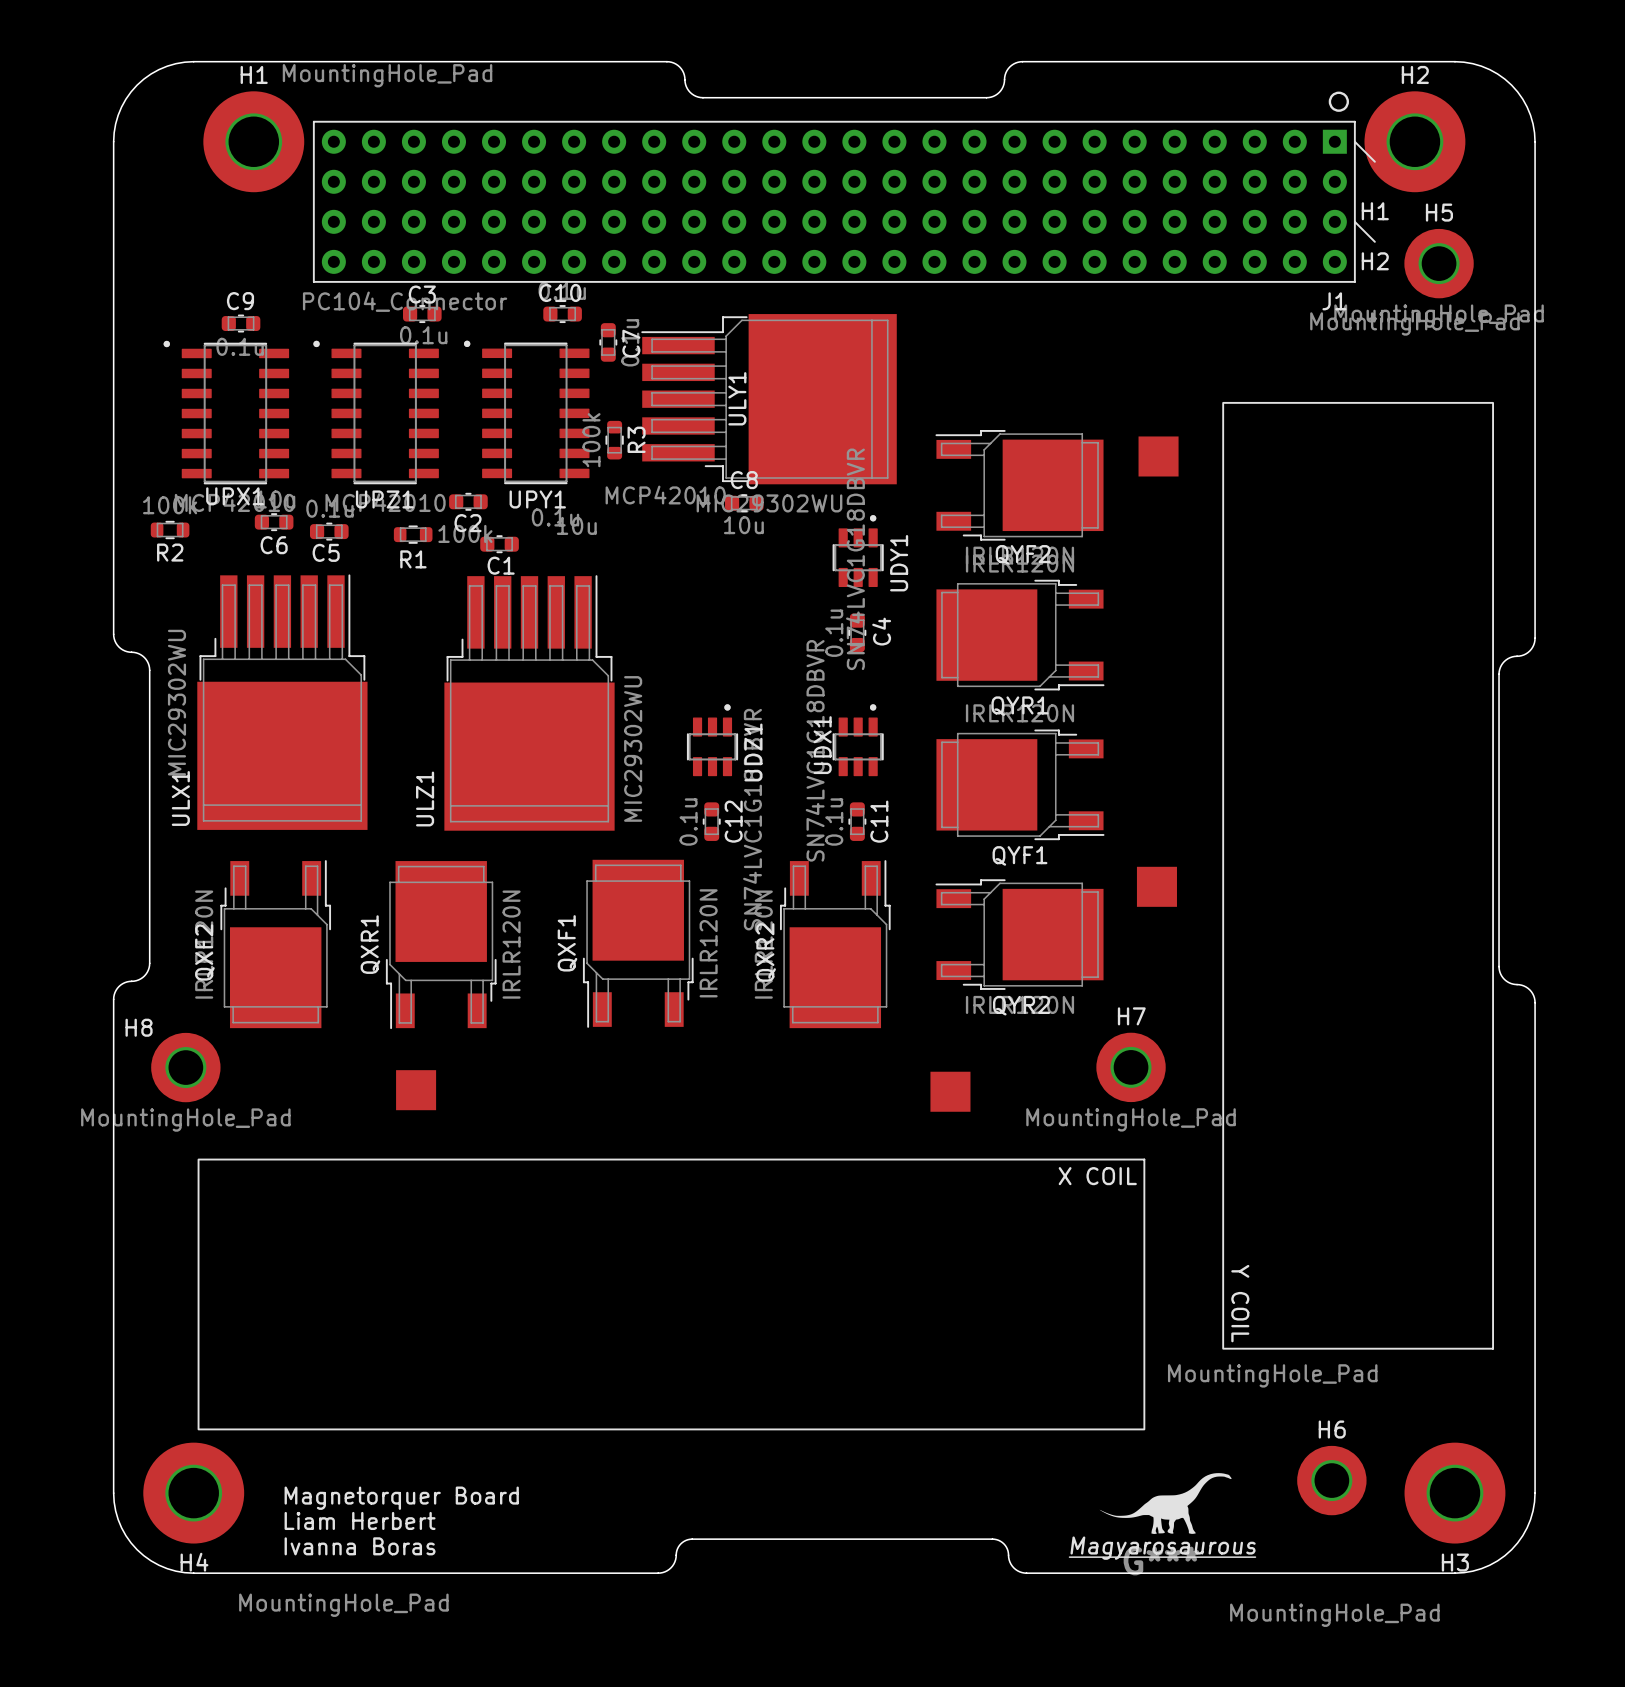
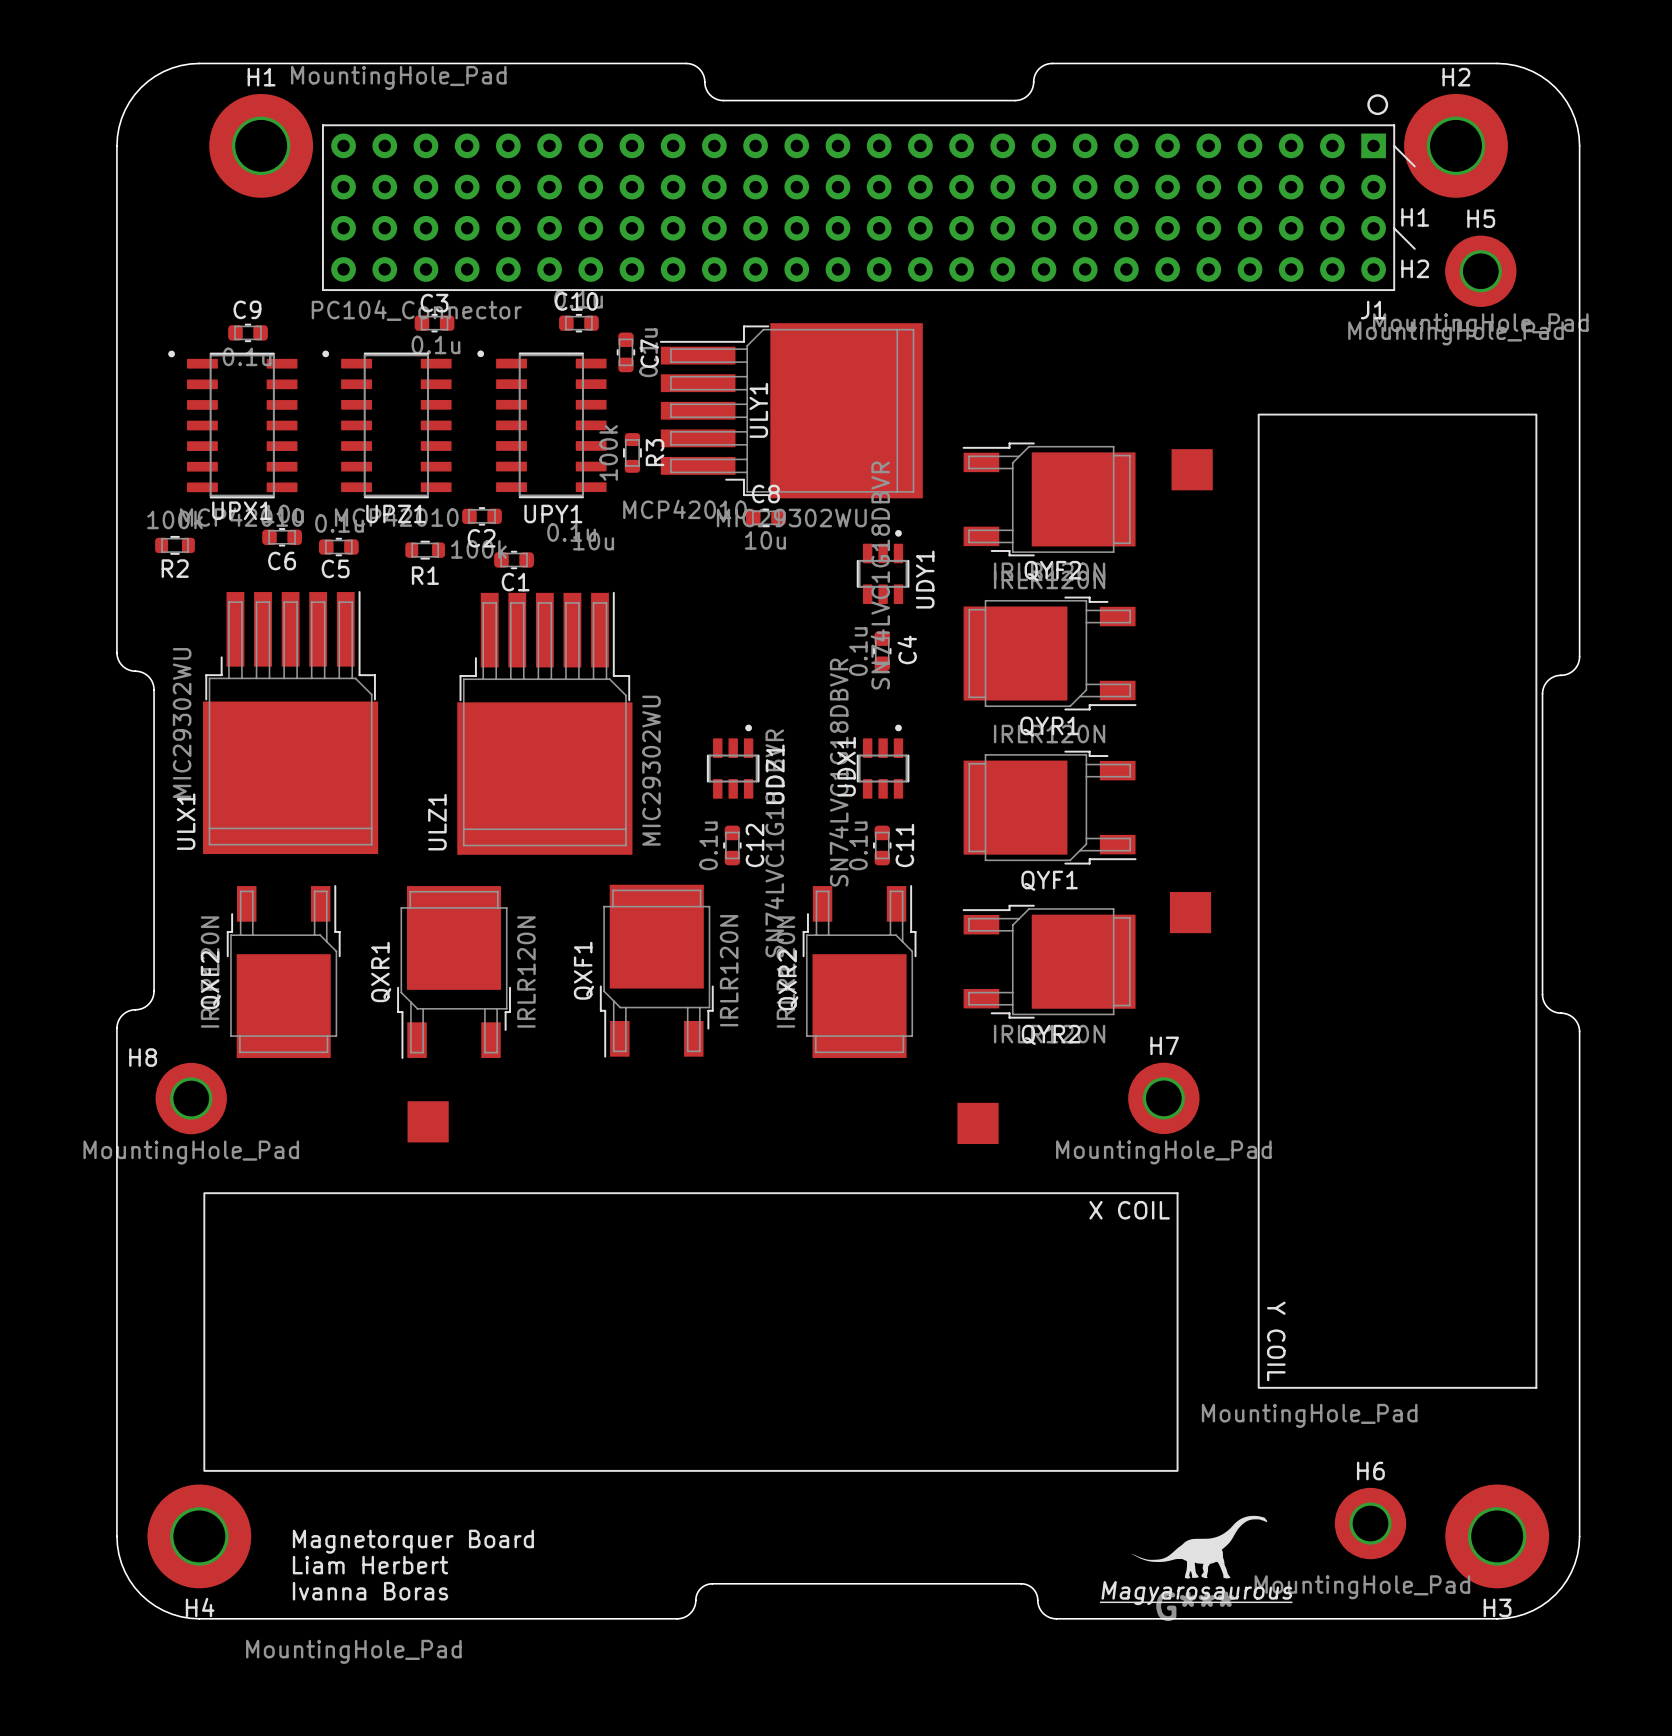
H3 value position: MountingHole_Pad (1334, 1615) -> MountingHole_Pad (1362, 1587)

